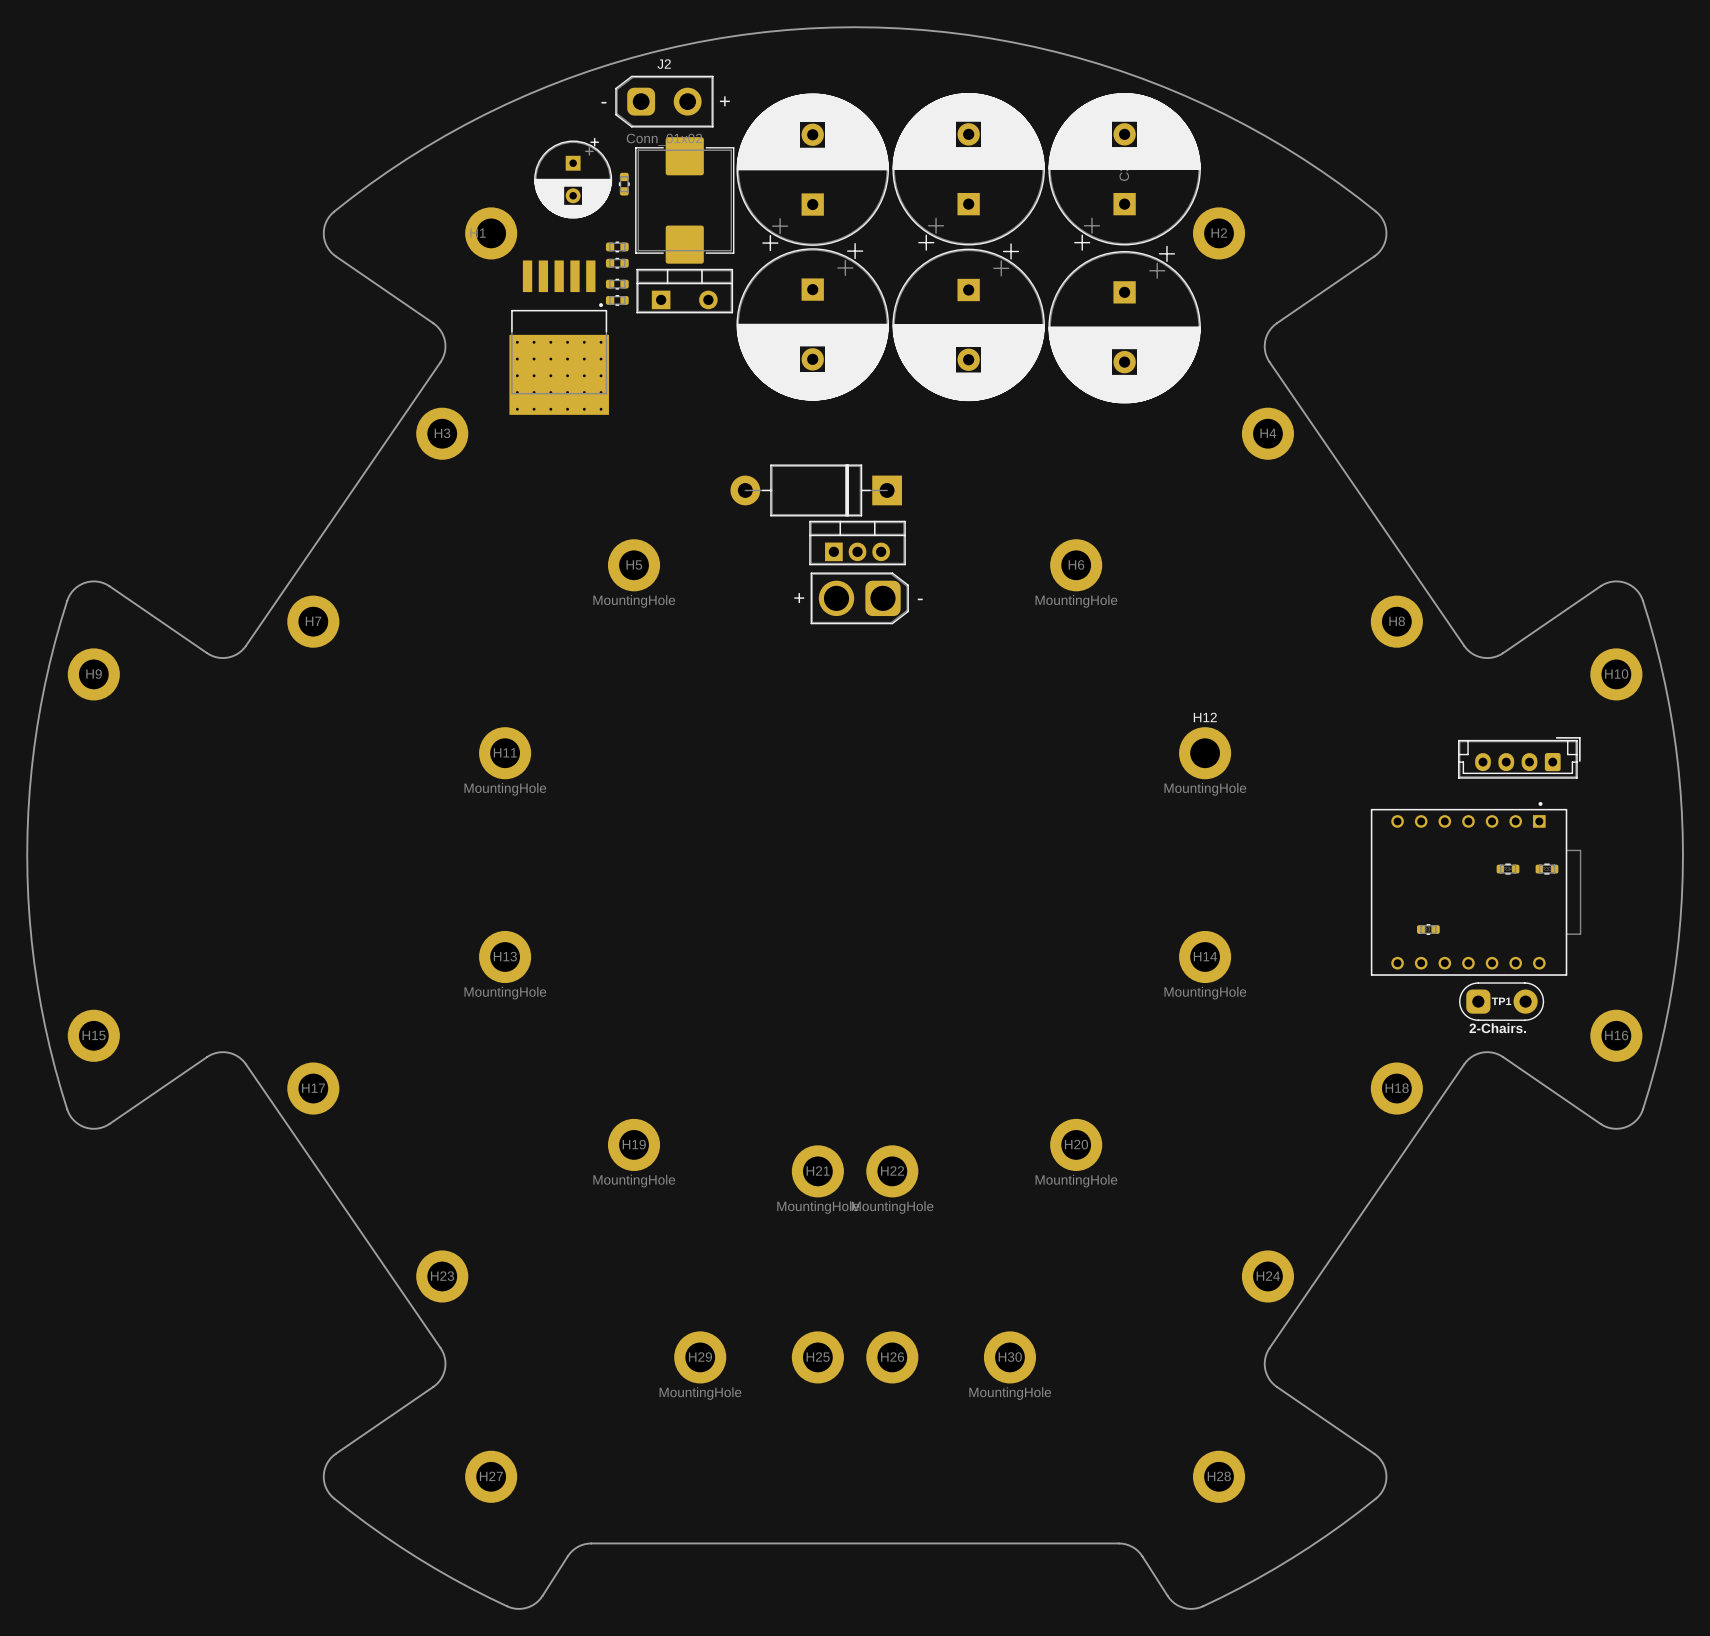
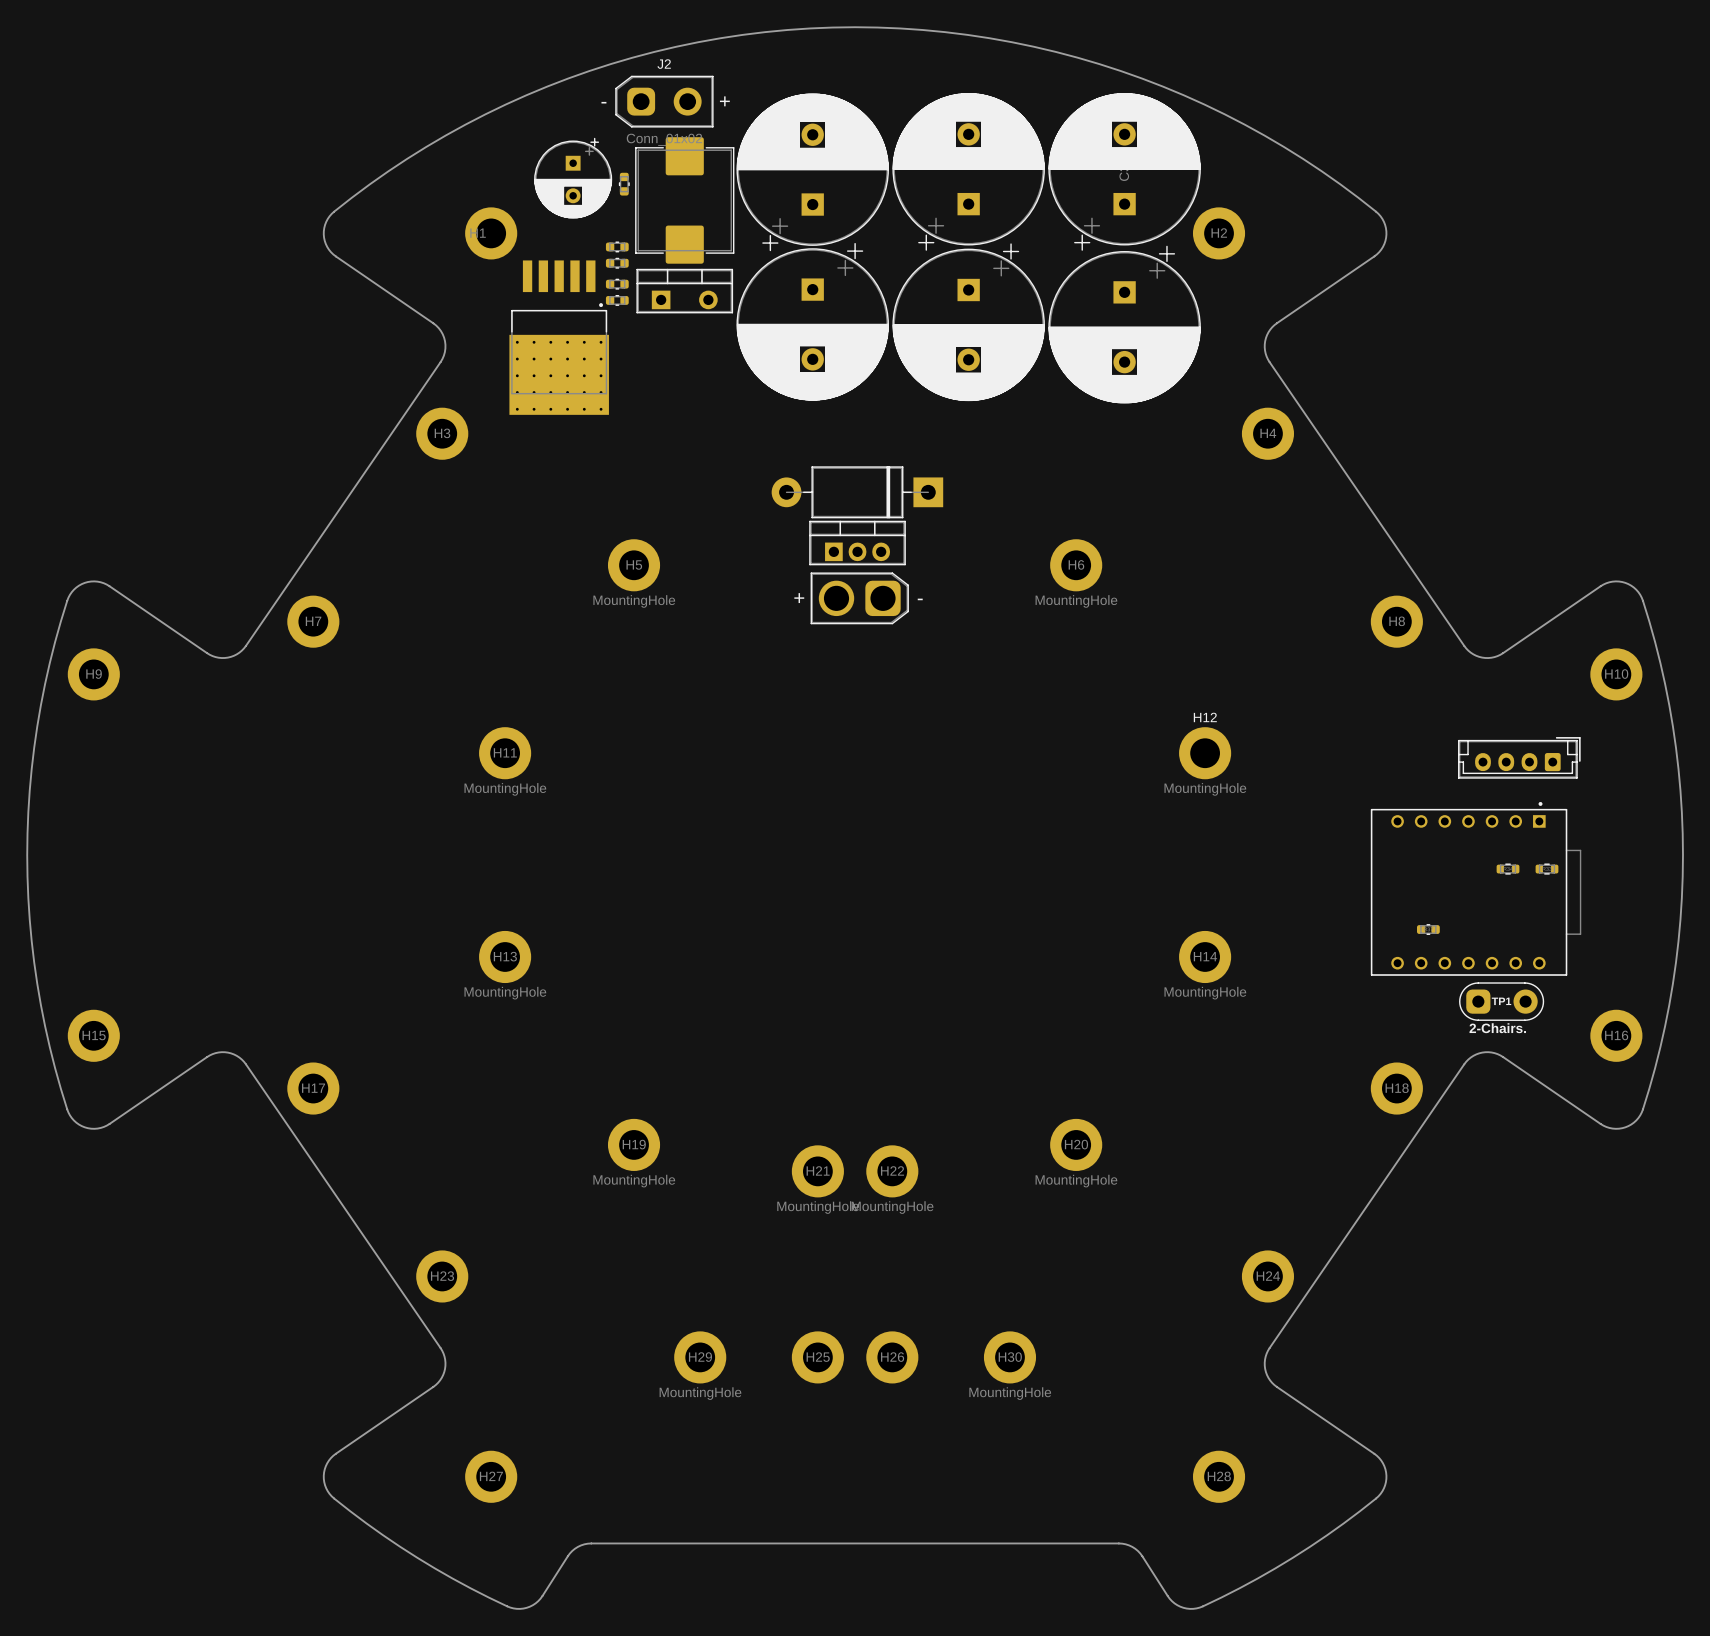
part position: (816, 490) -> (857, 492)

